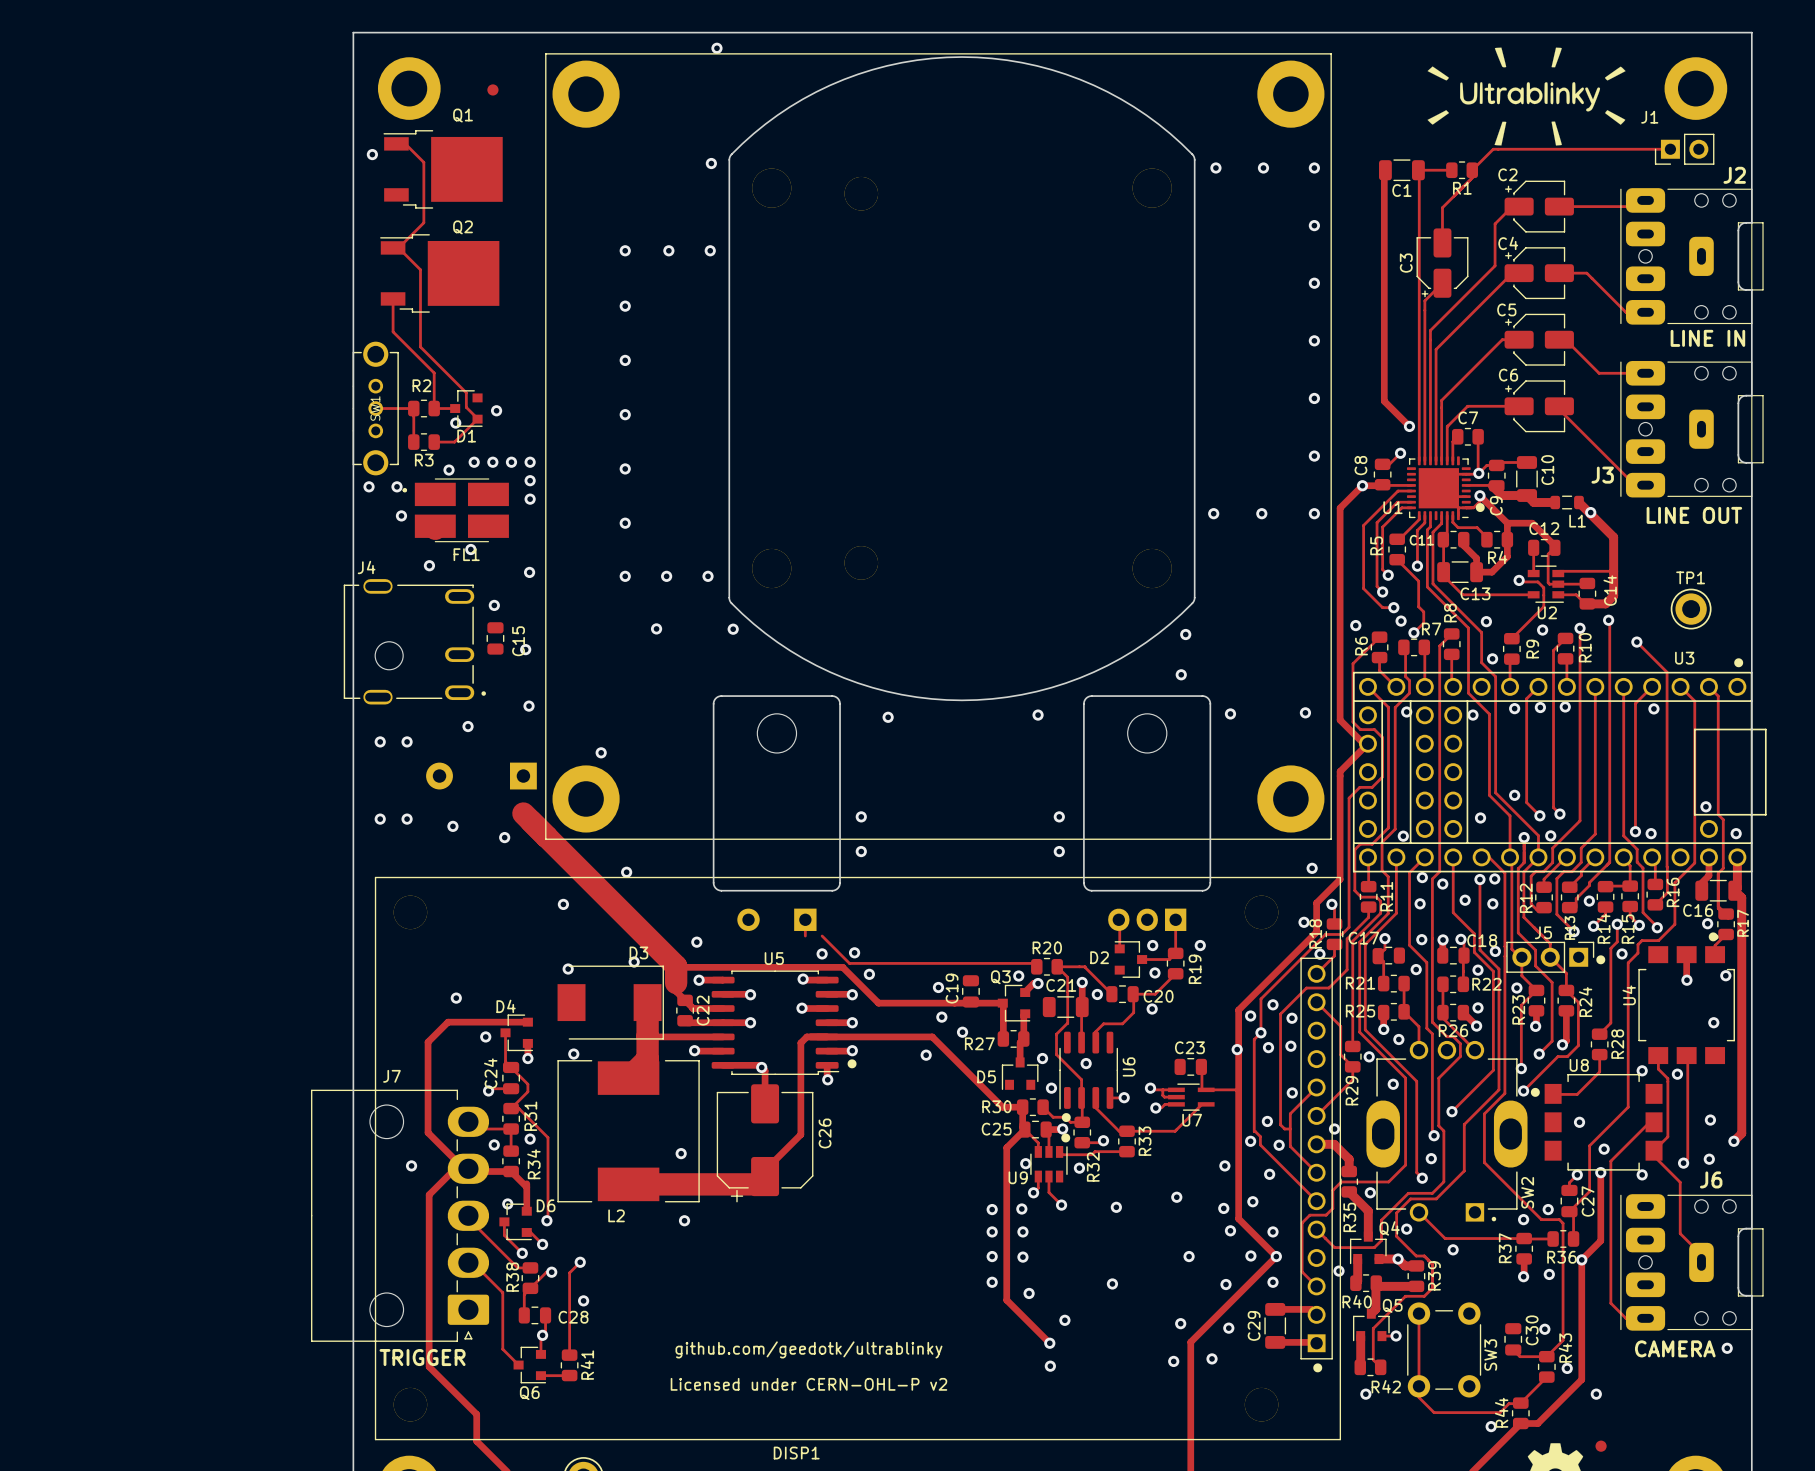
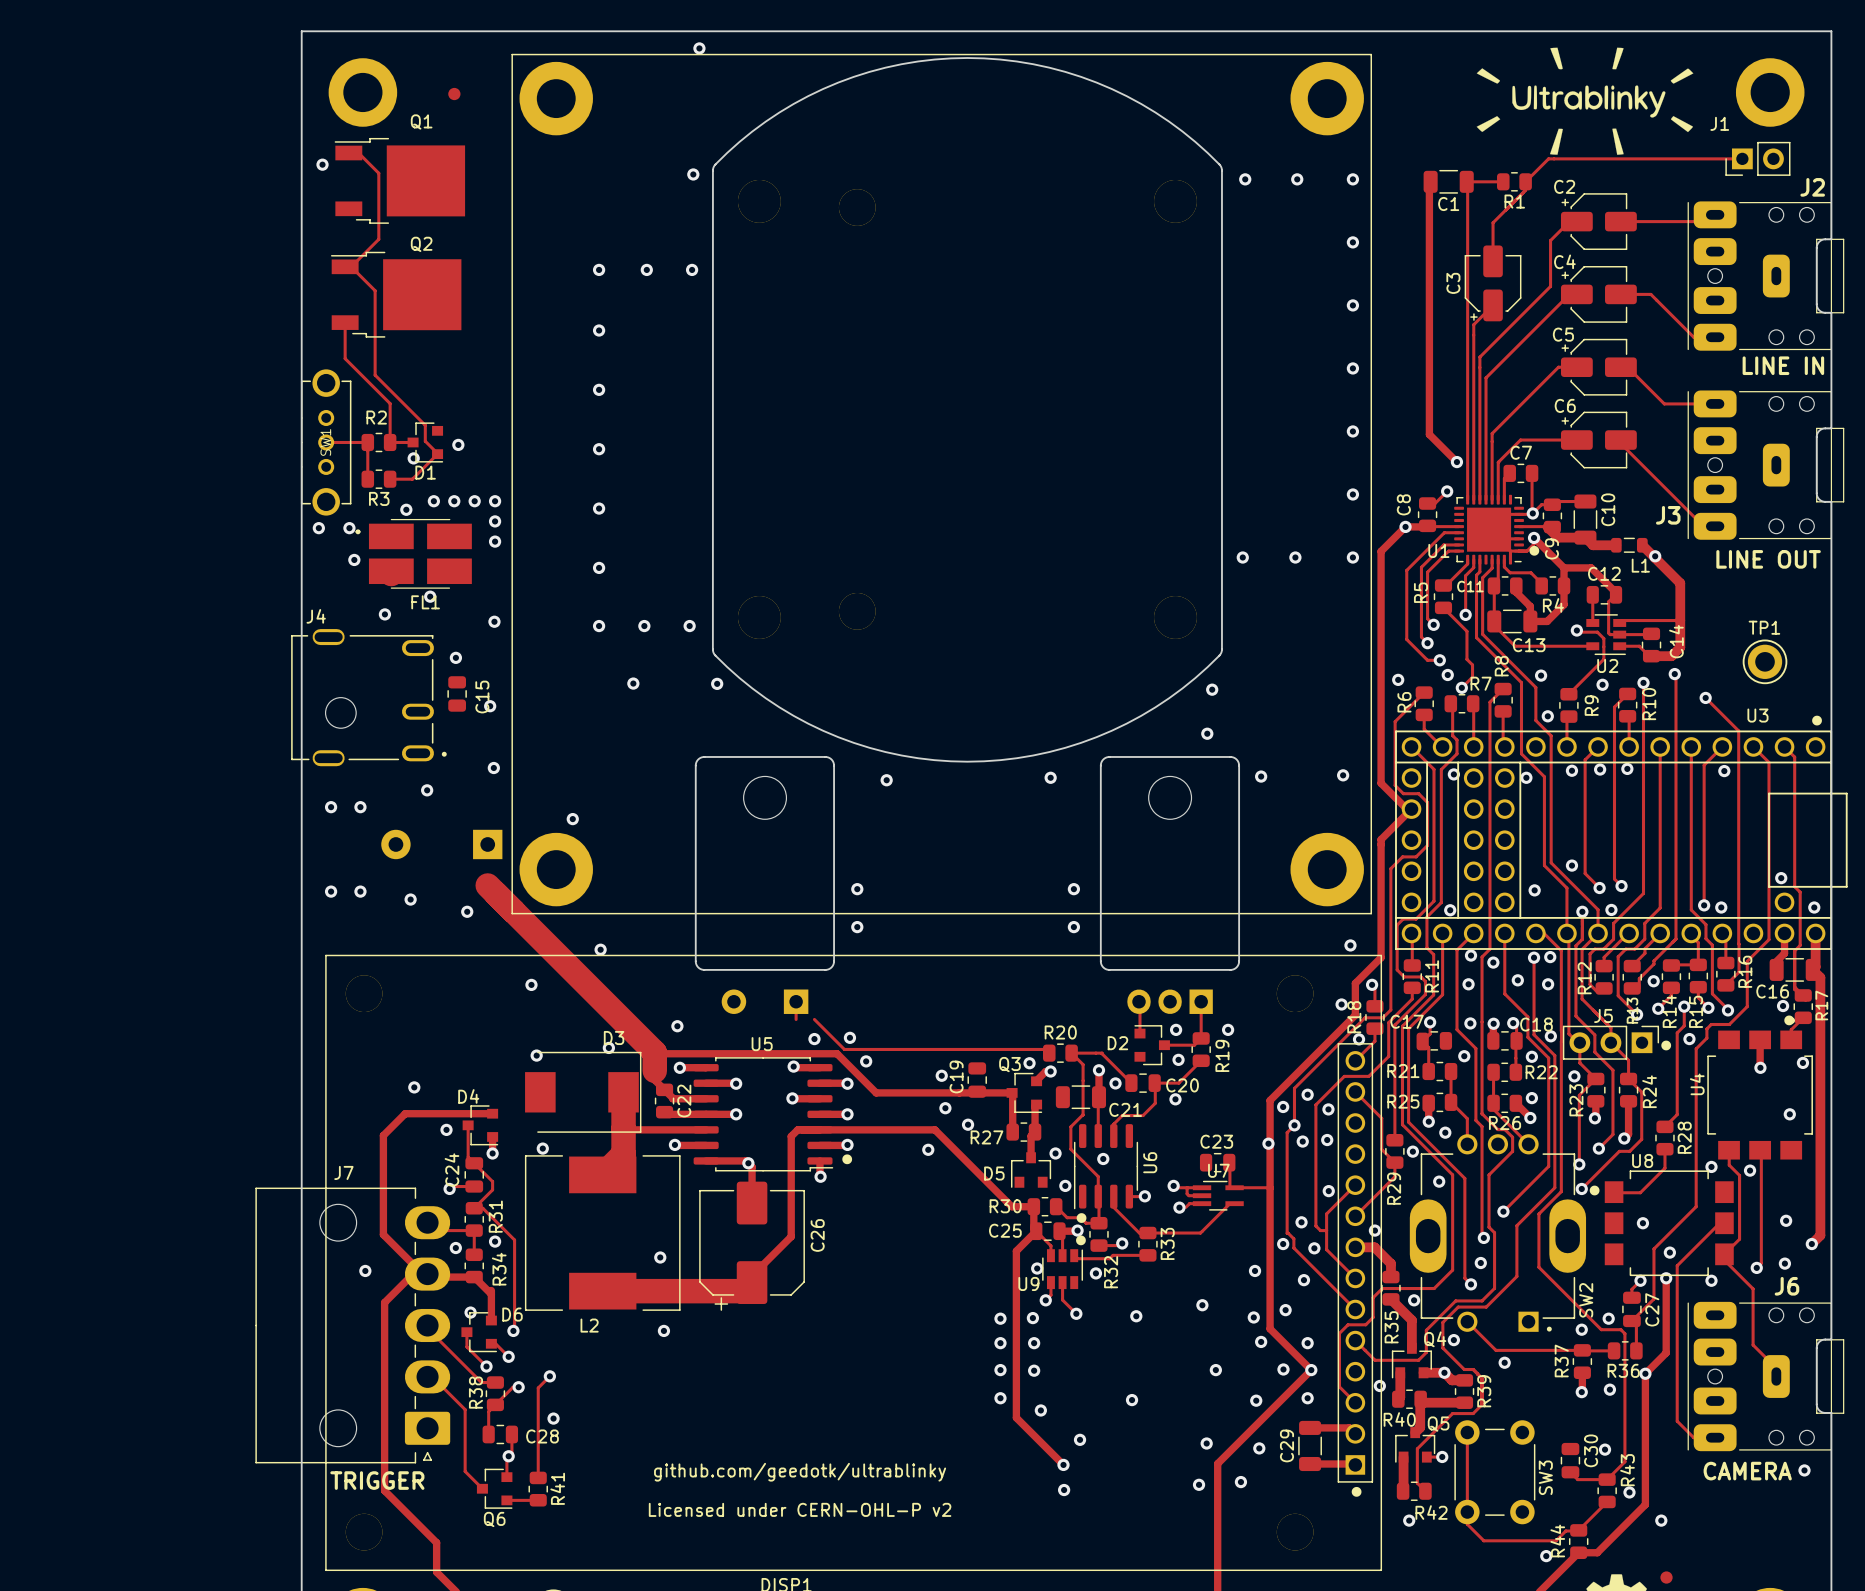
C21 name position: C21 (1061, 985) -> C21 (1125, 1109)
U7 name position: U7 (1192, 1120) -> U7 (1218, 1170)

